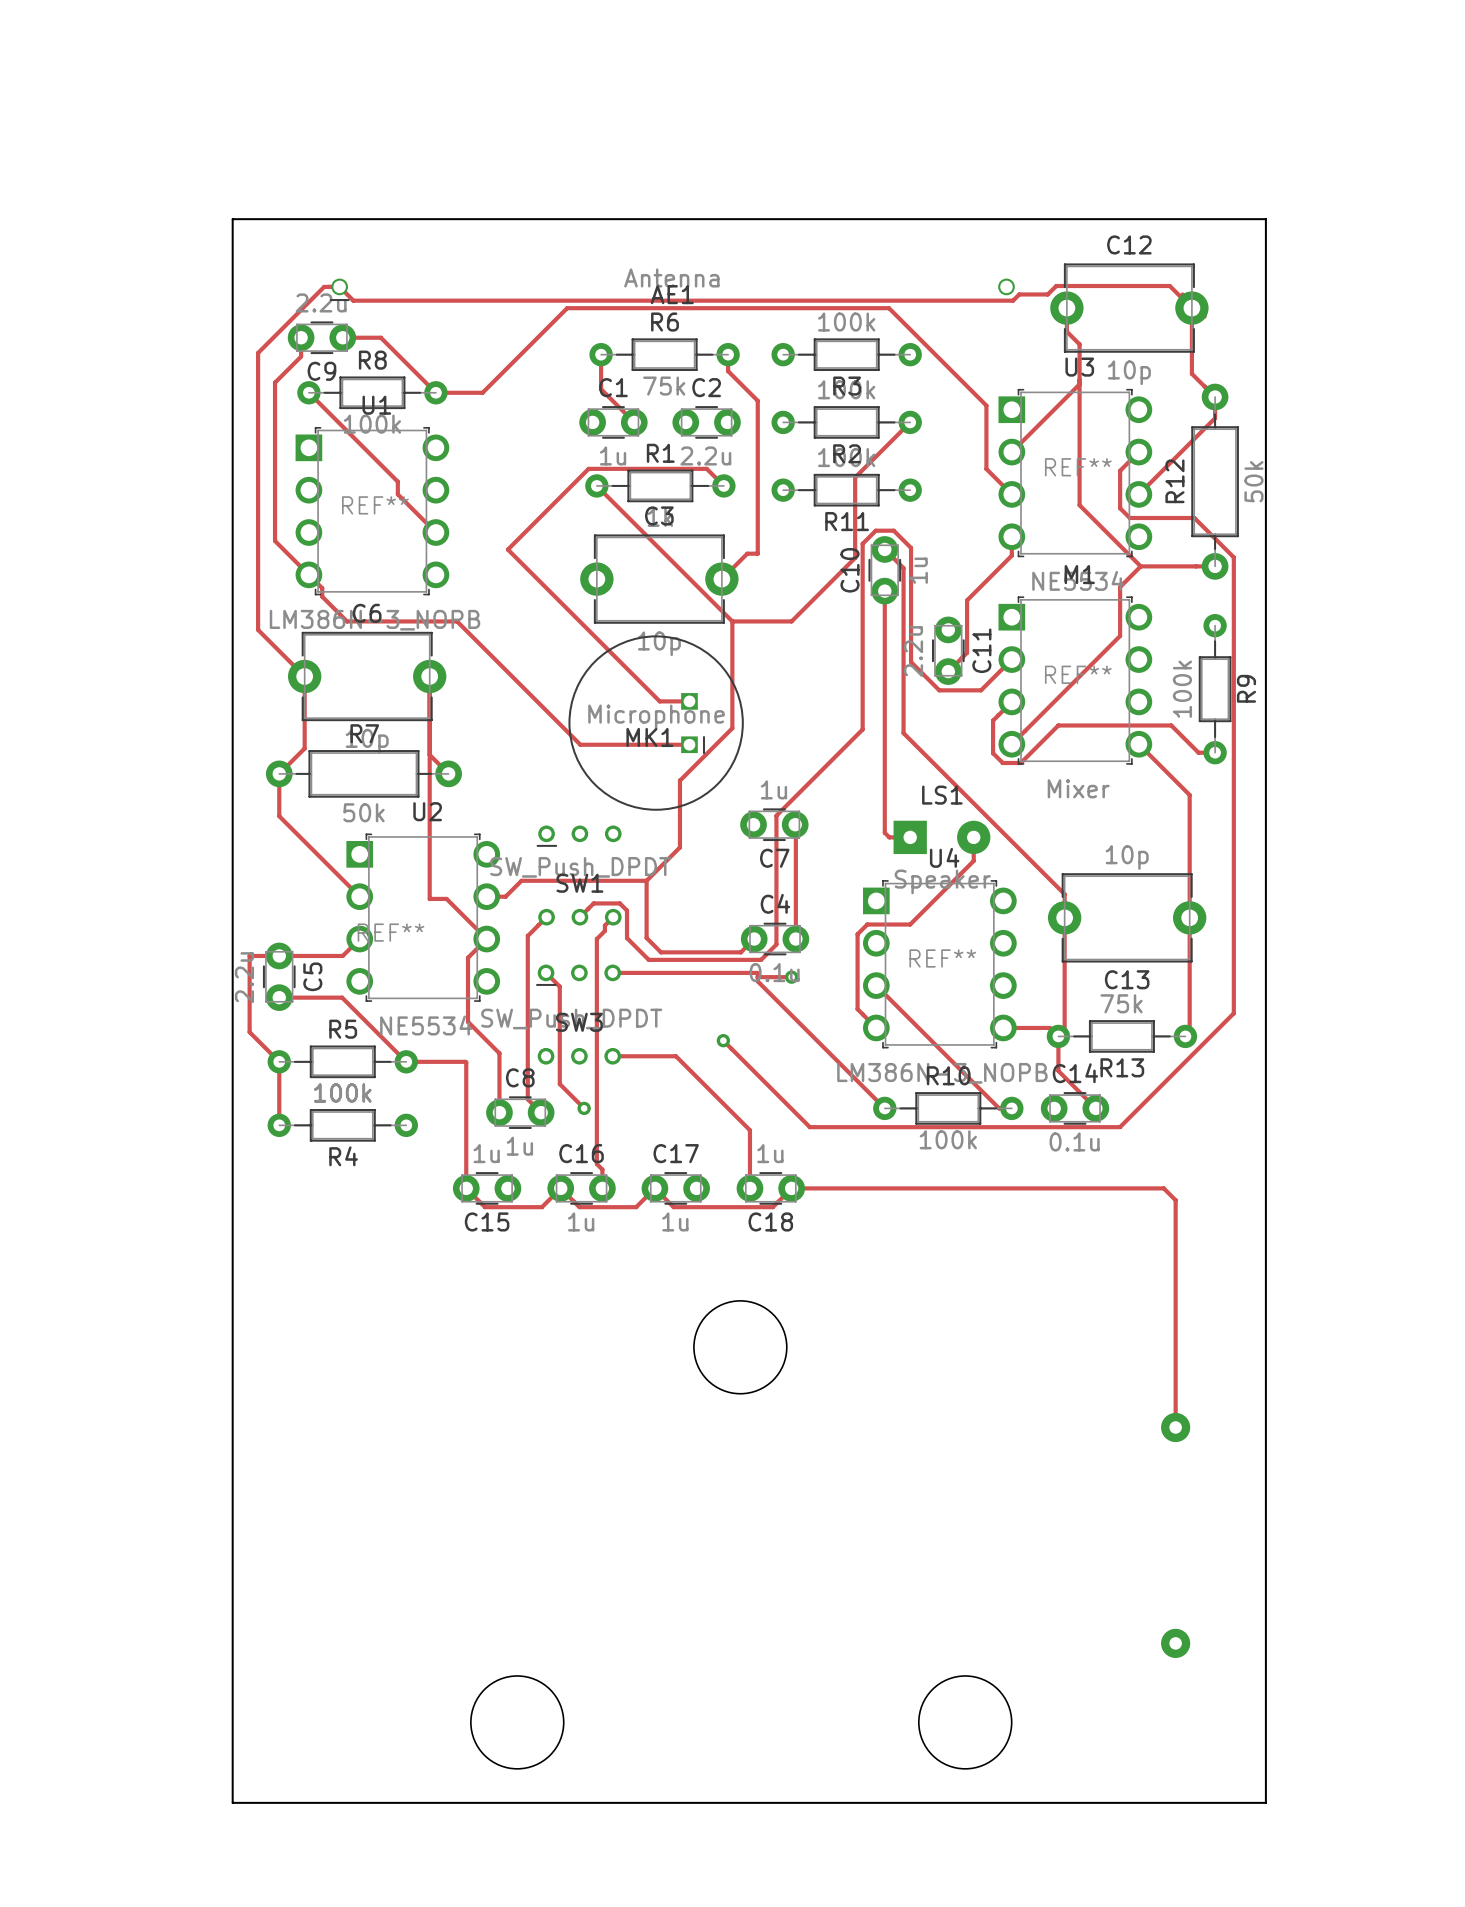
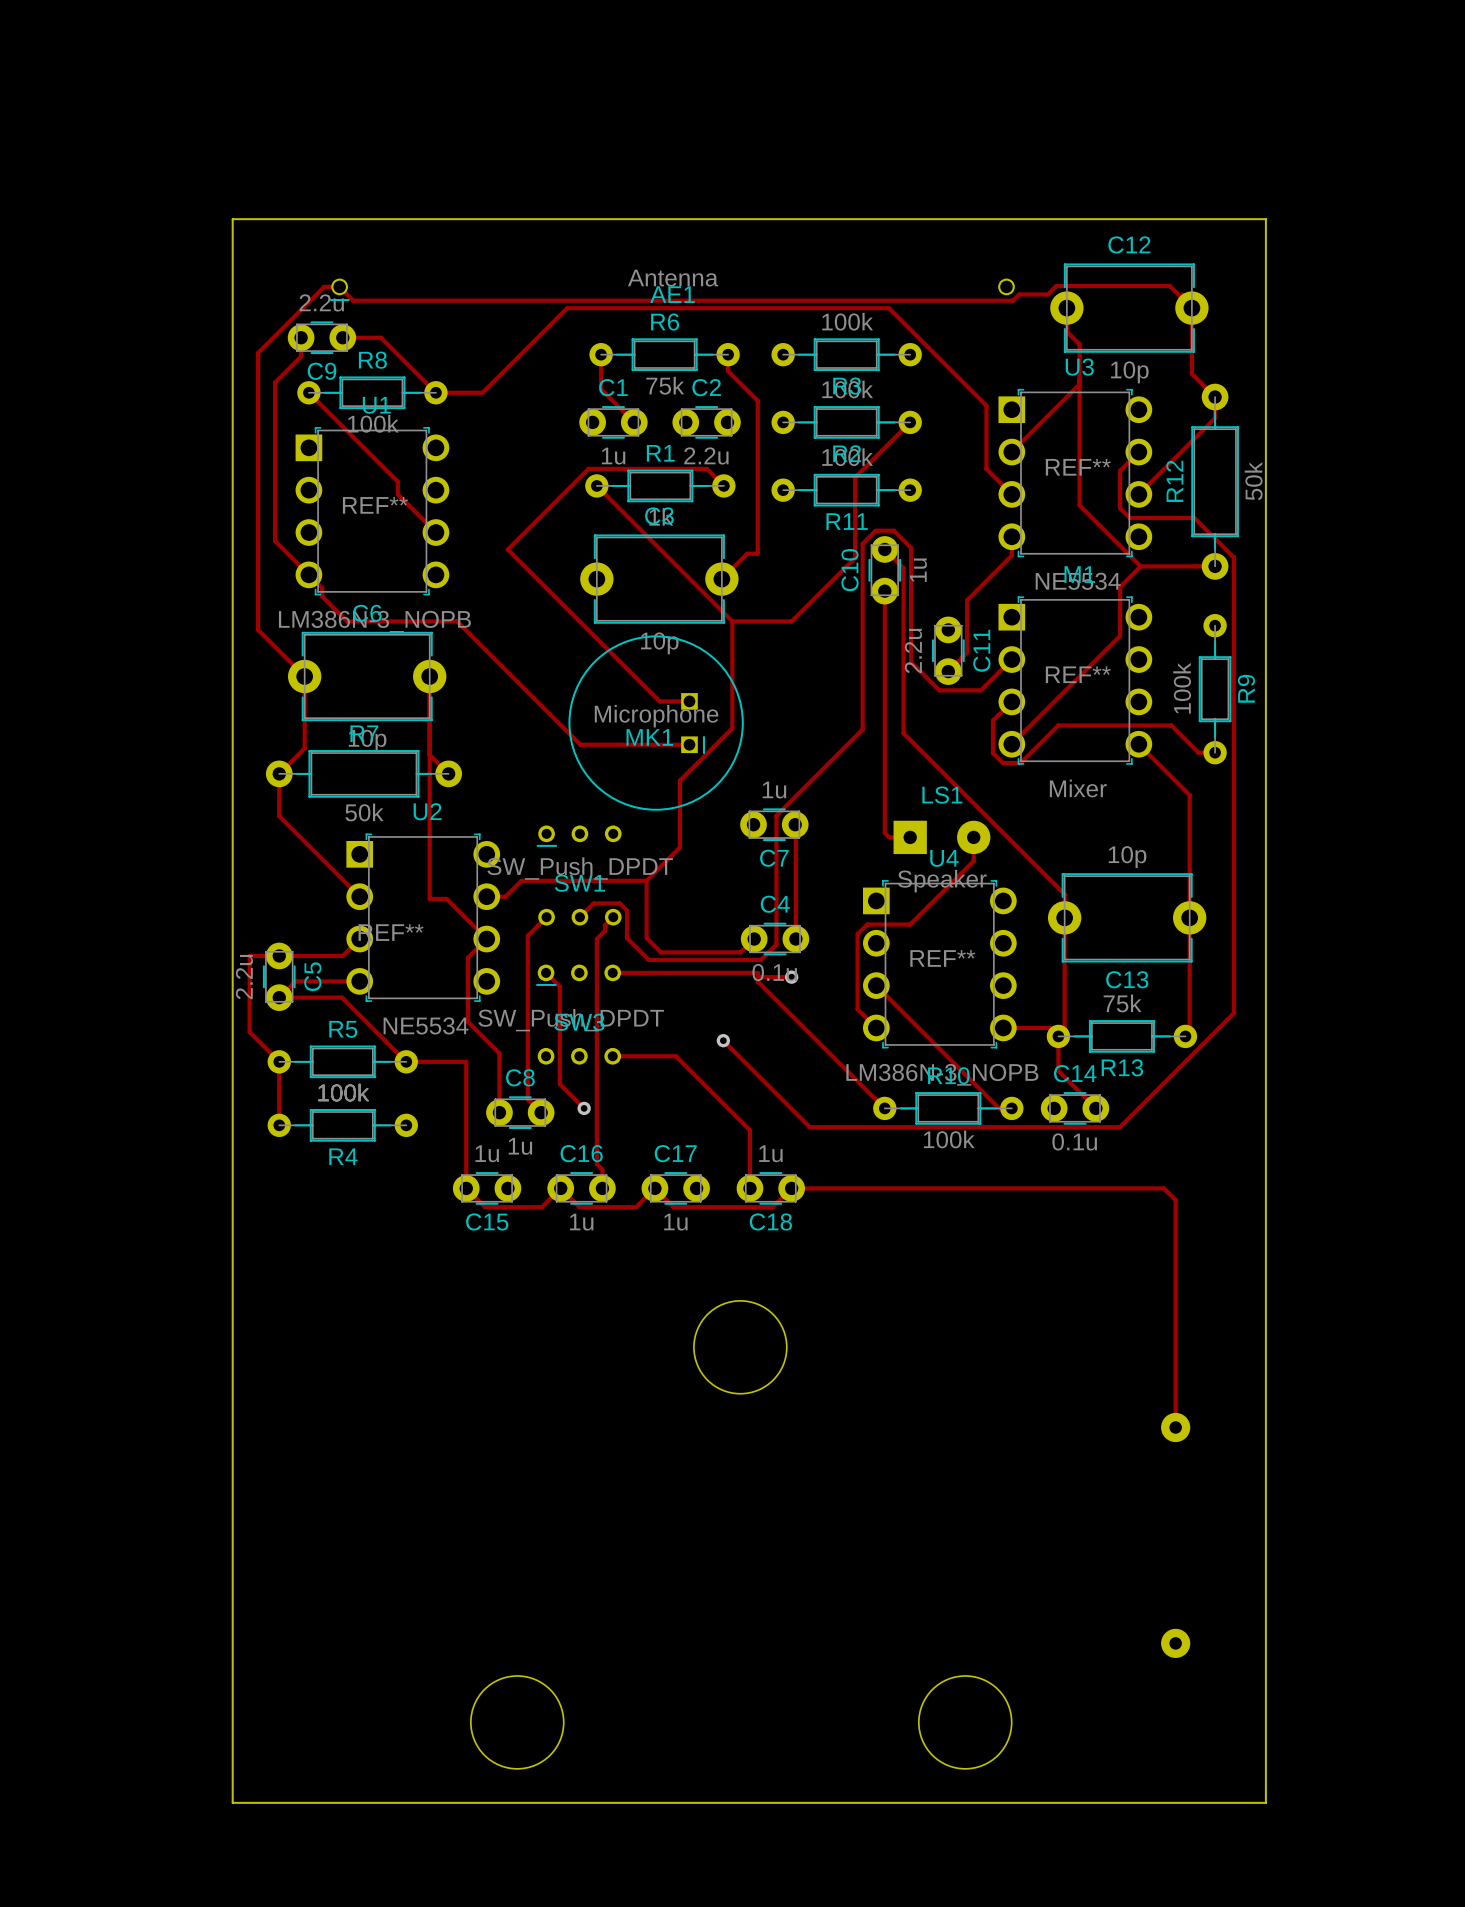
track: none -> (359, 981) (295, 981) (279, 997)

